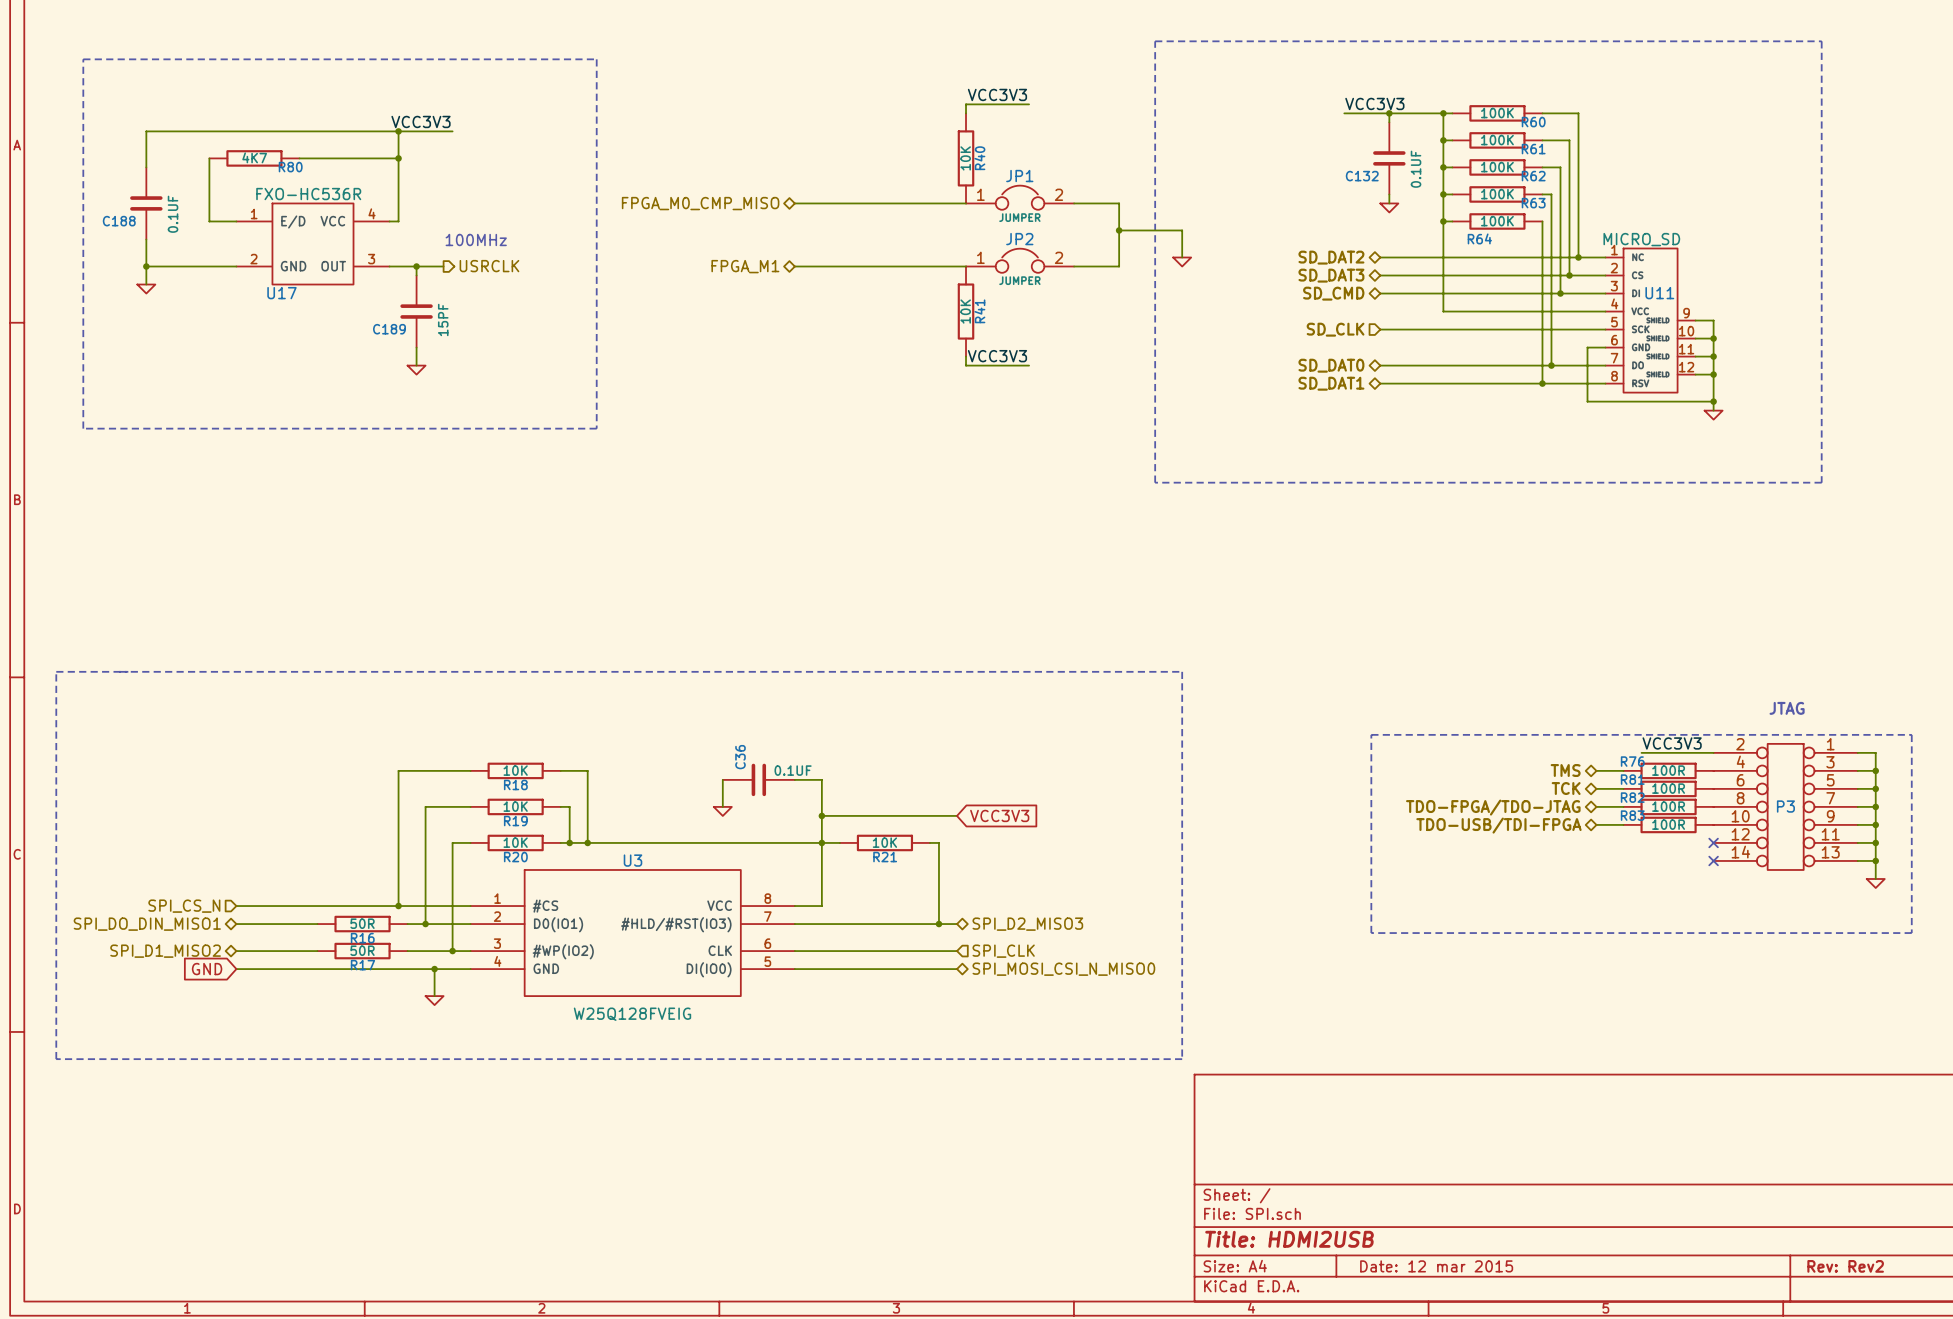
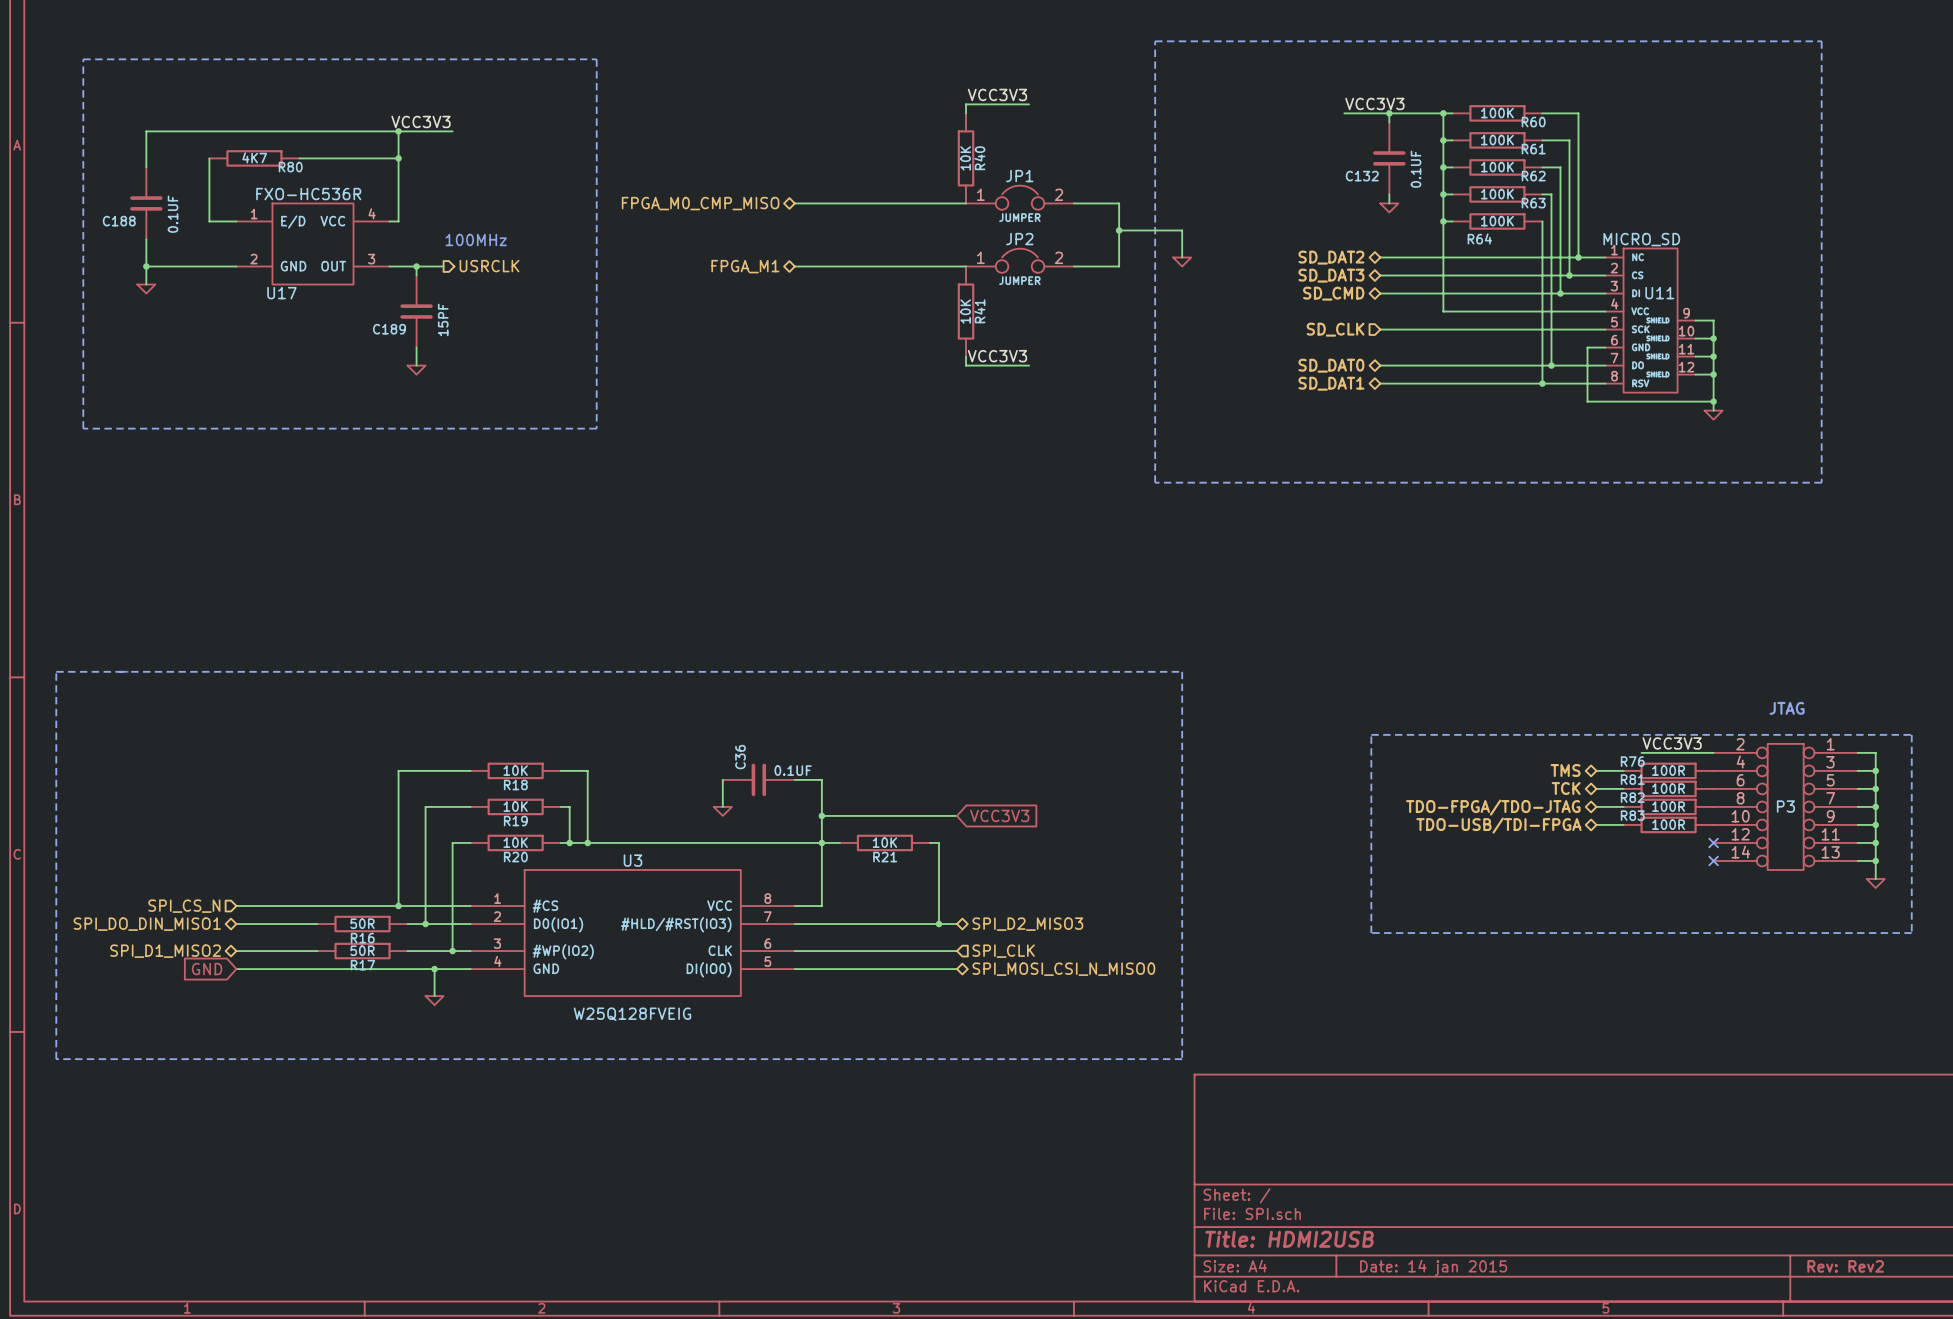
title block: Date: 12 mar 2015 (1436, 1266) -> Date: 14 jan 2015 (1433, 1267)

